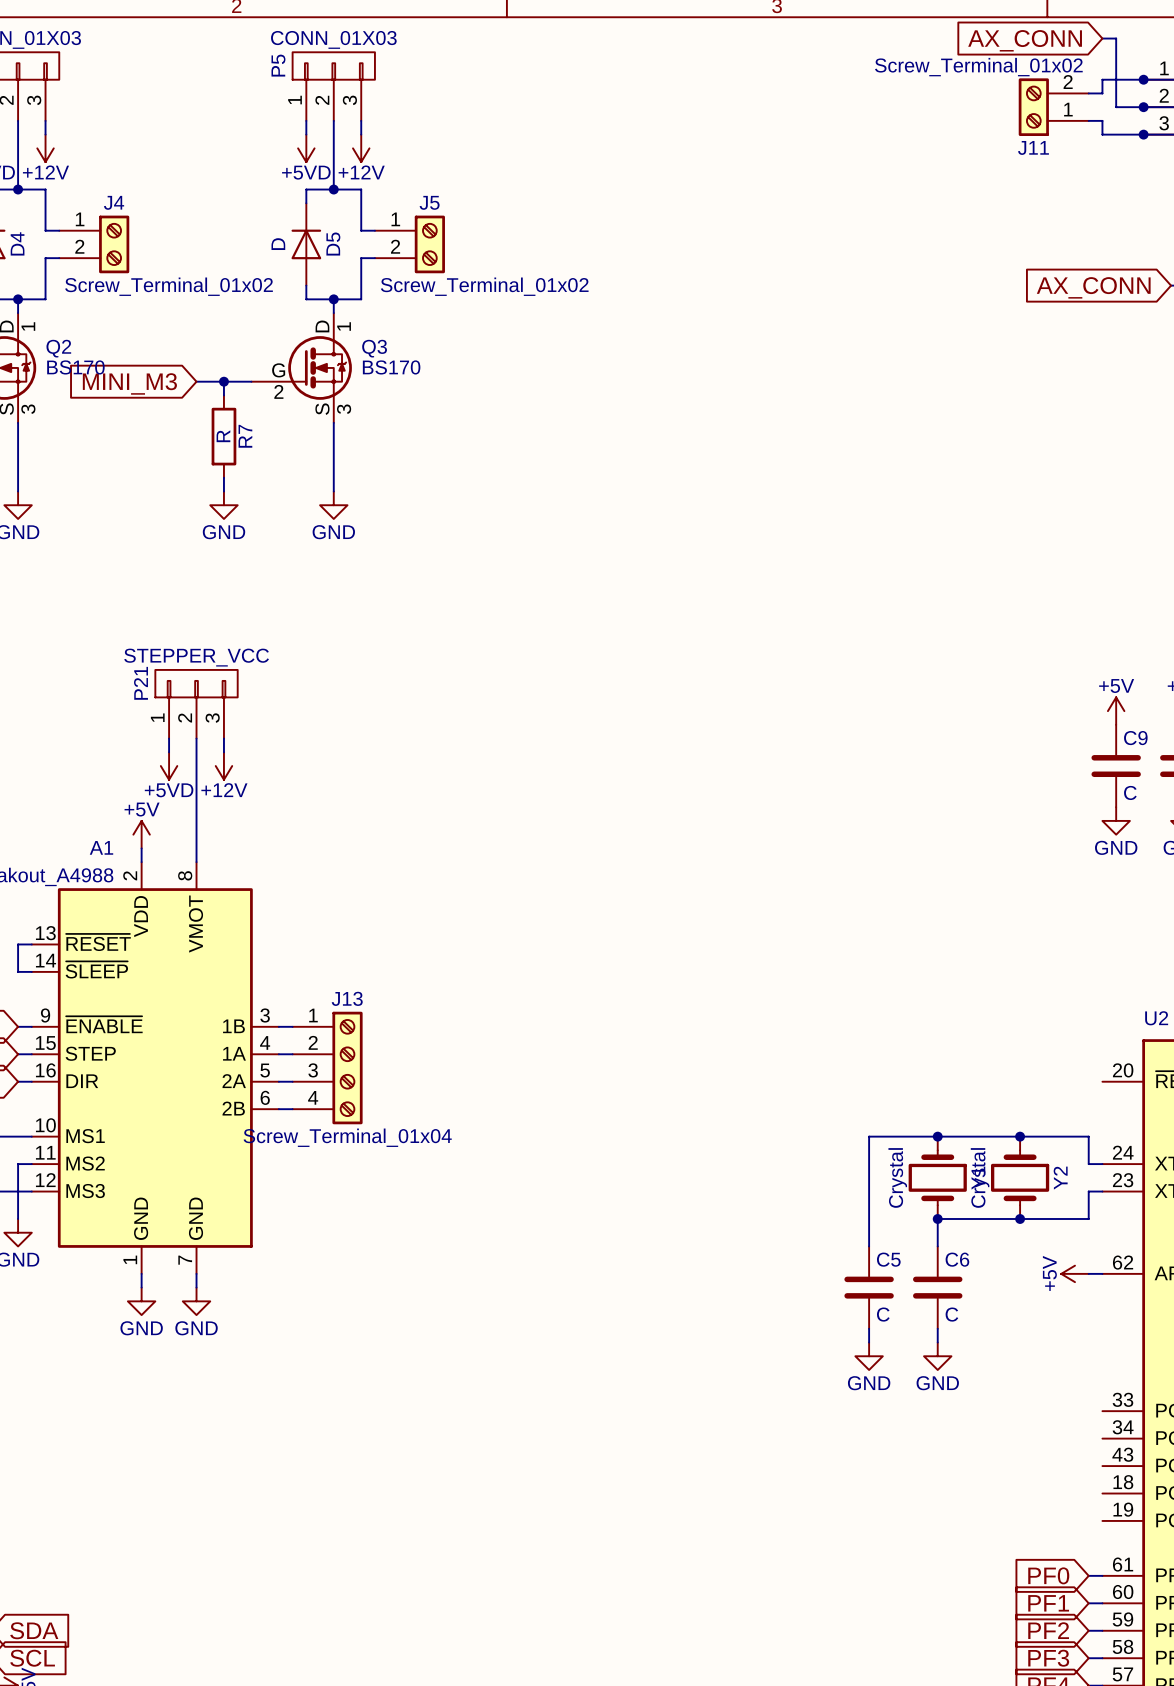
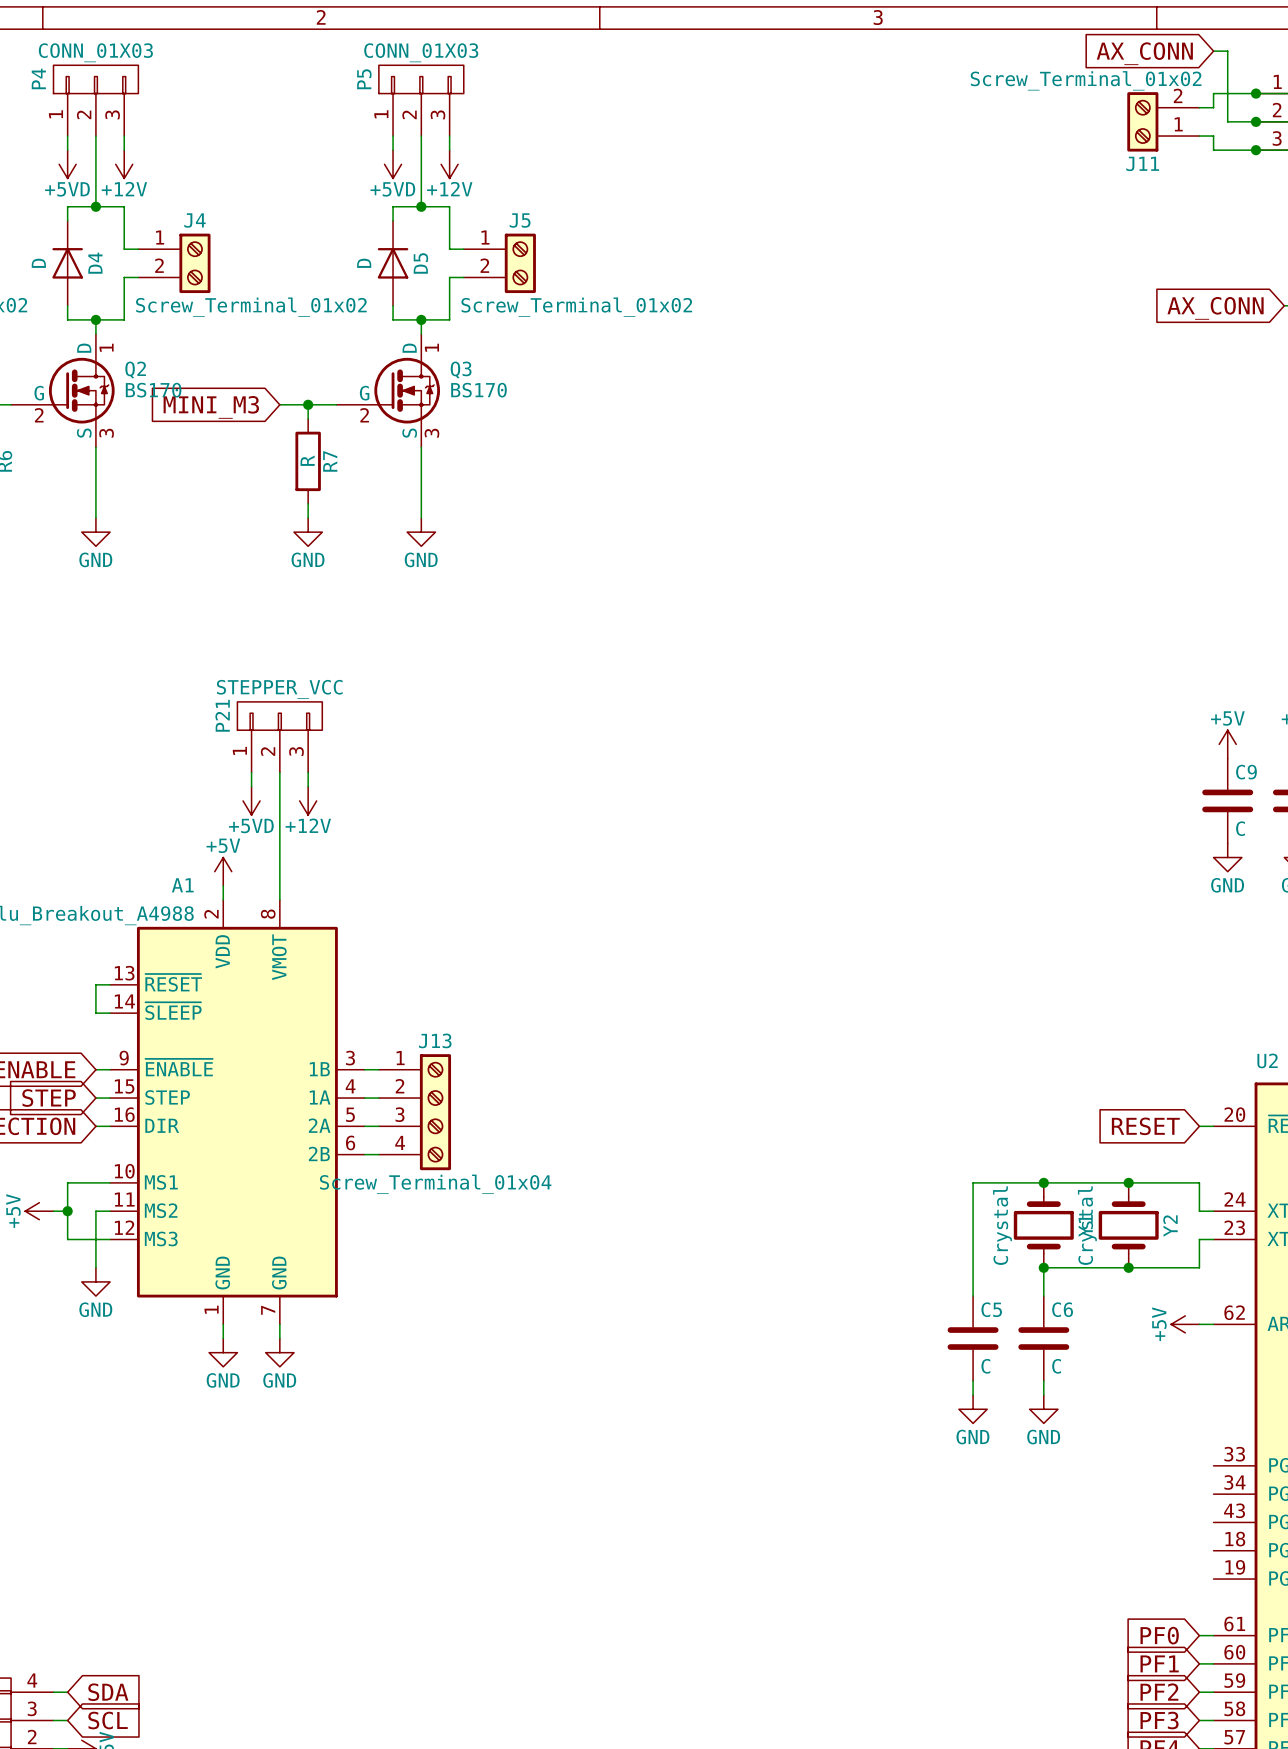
global label: none -> RESET (1145, 1126)
wire: none -> (1199, 1126) (1213, 1126)

